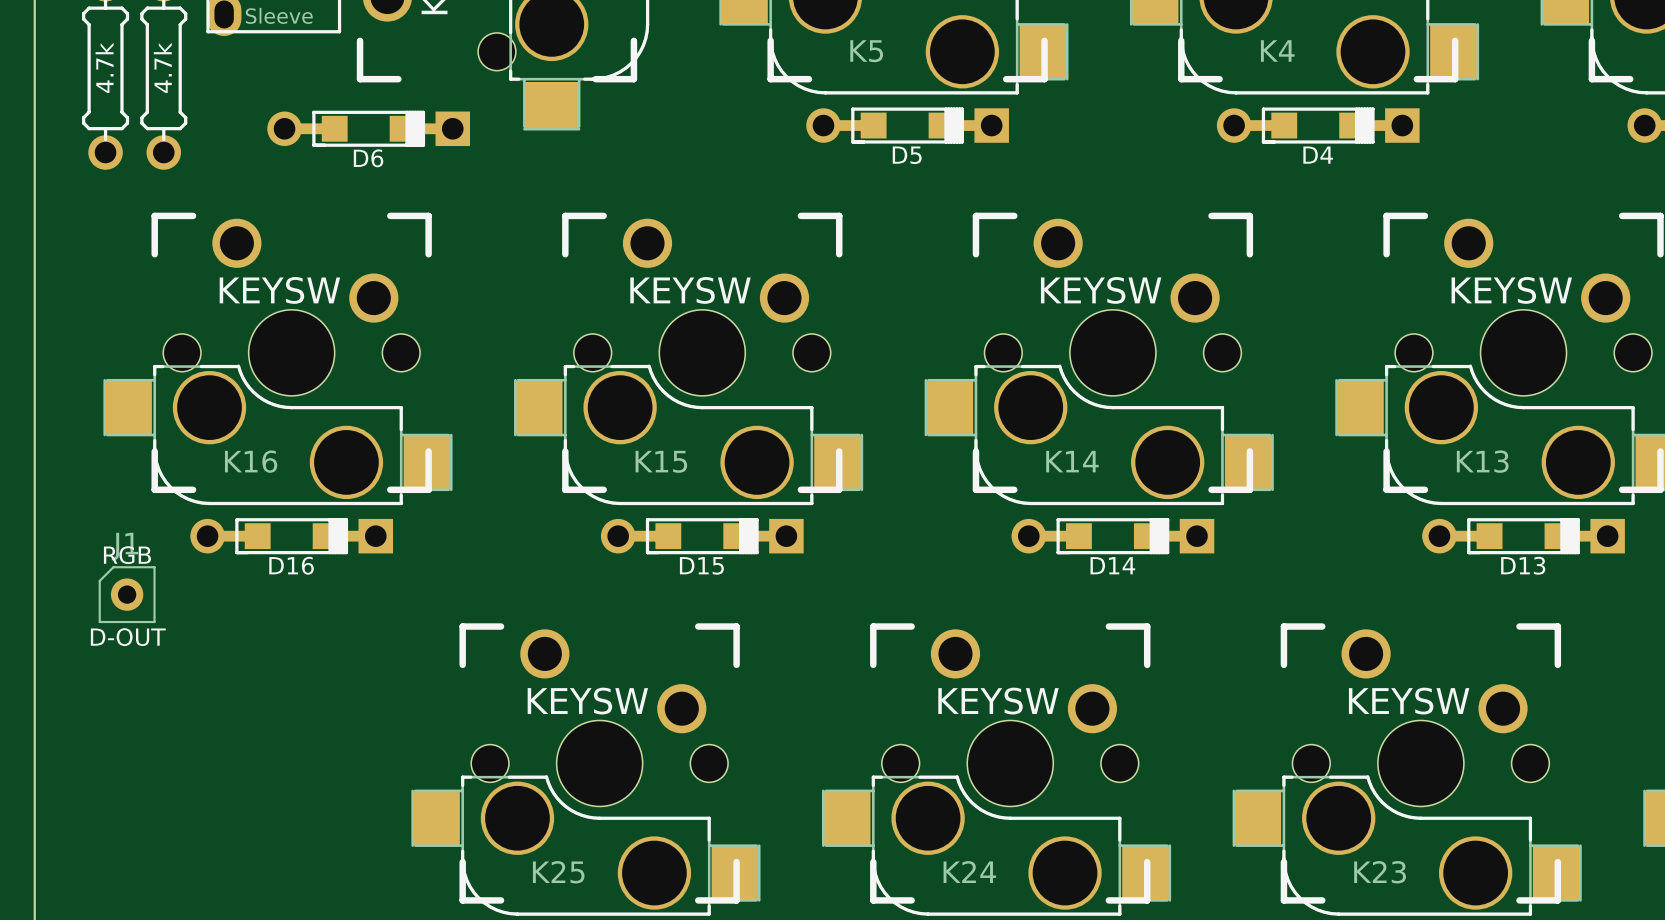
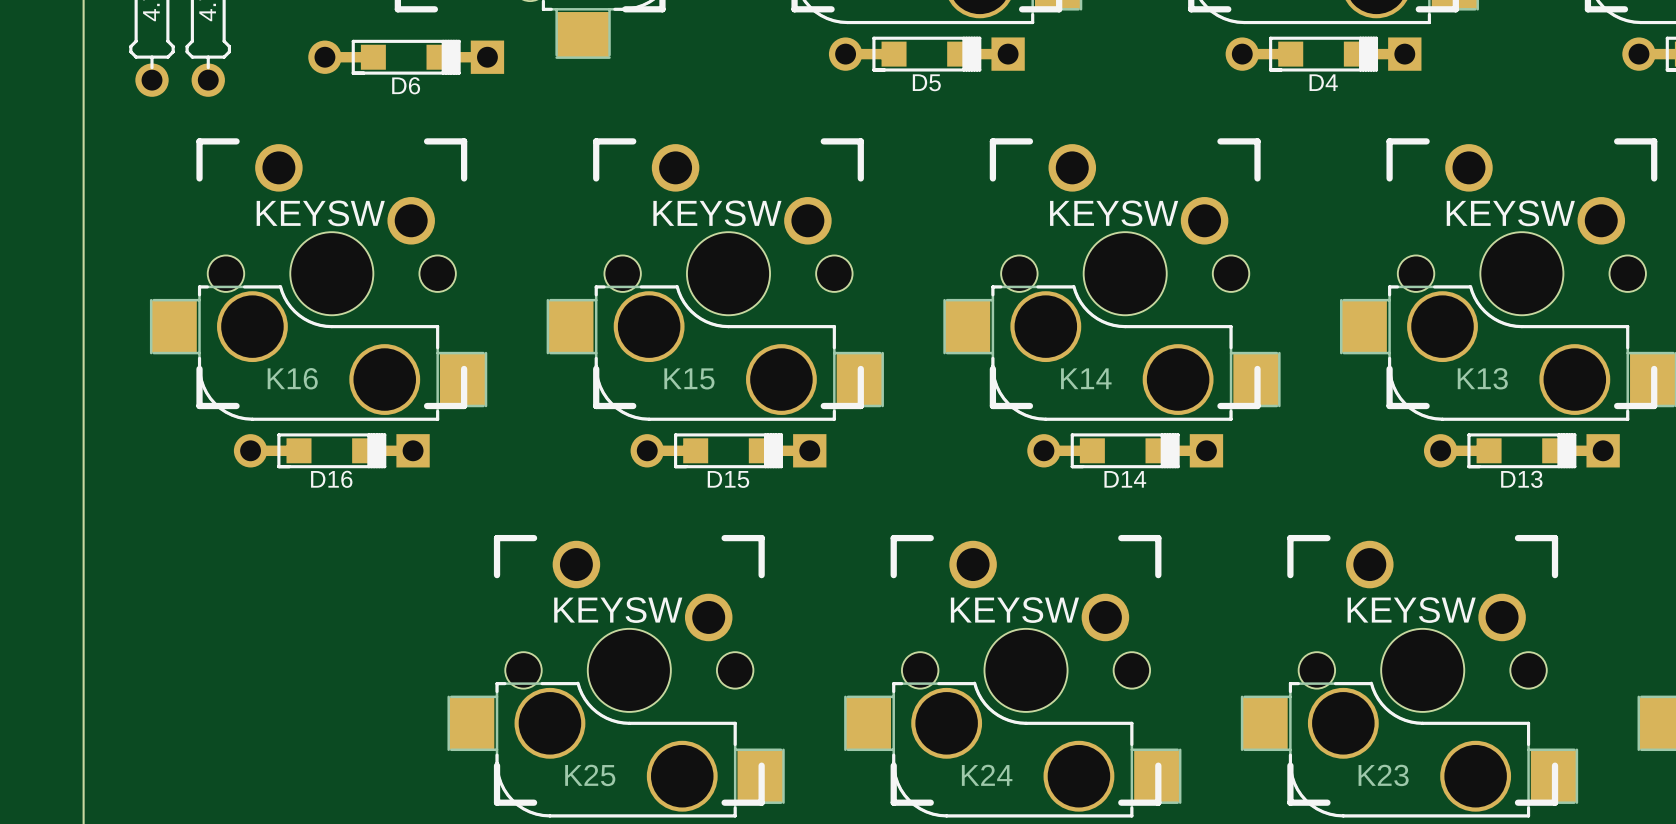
J1: D-OUT (127, 594) -> none

